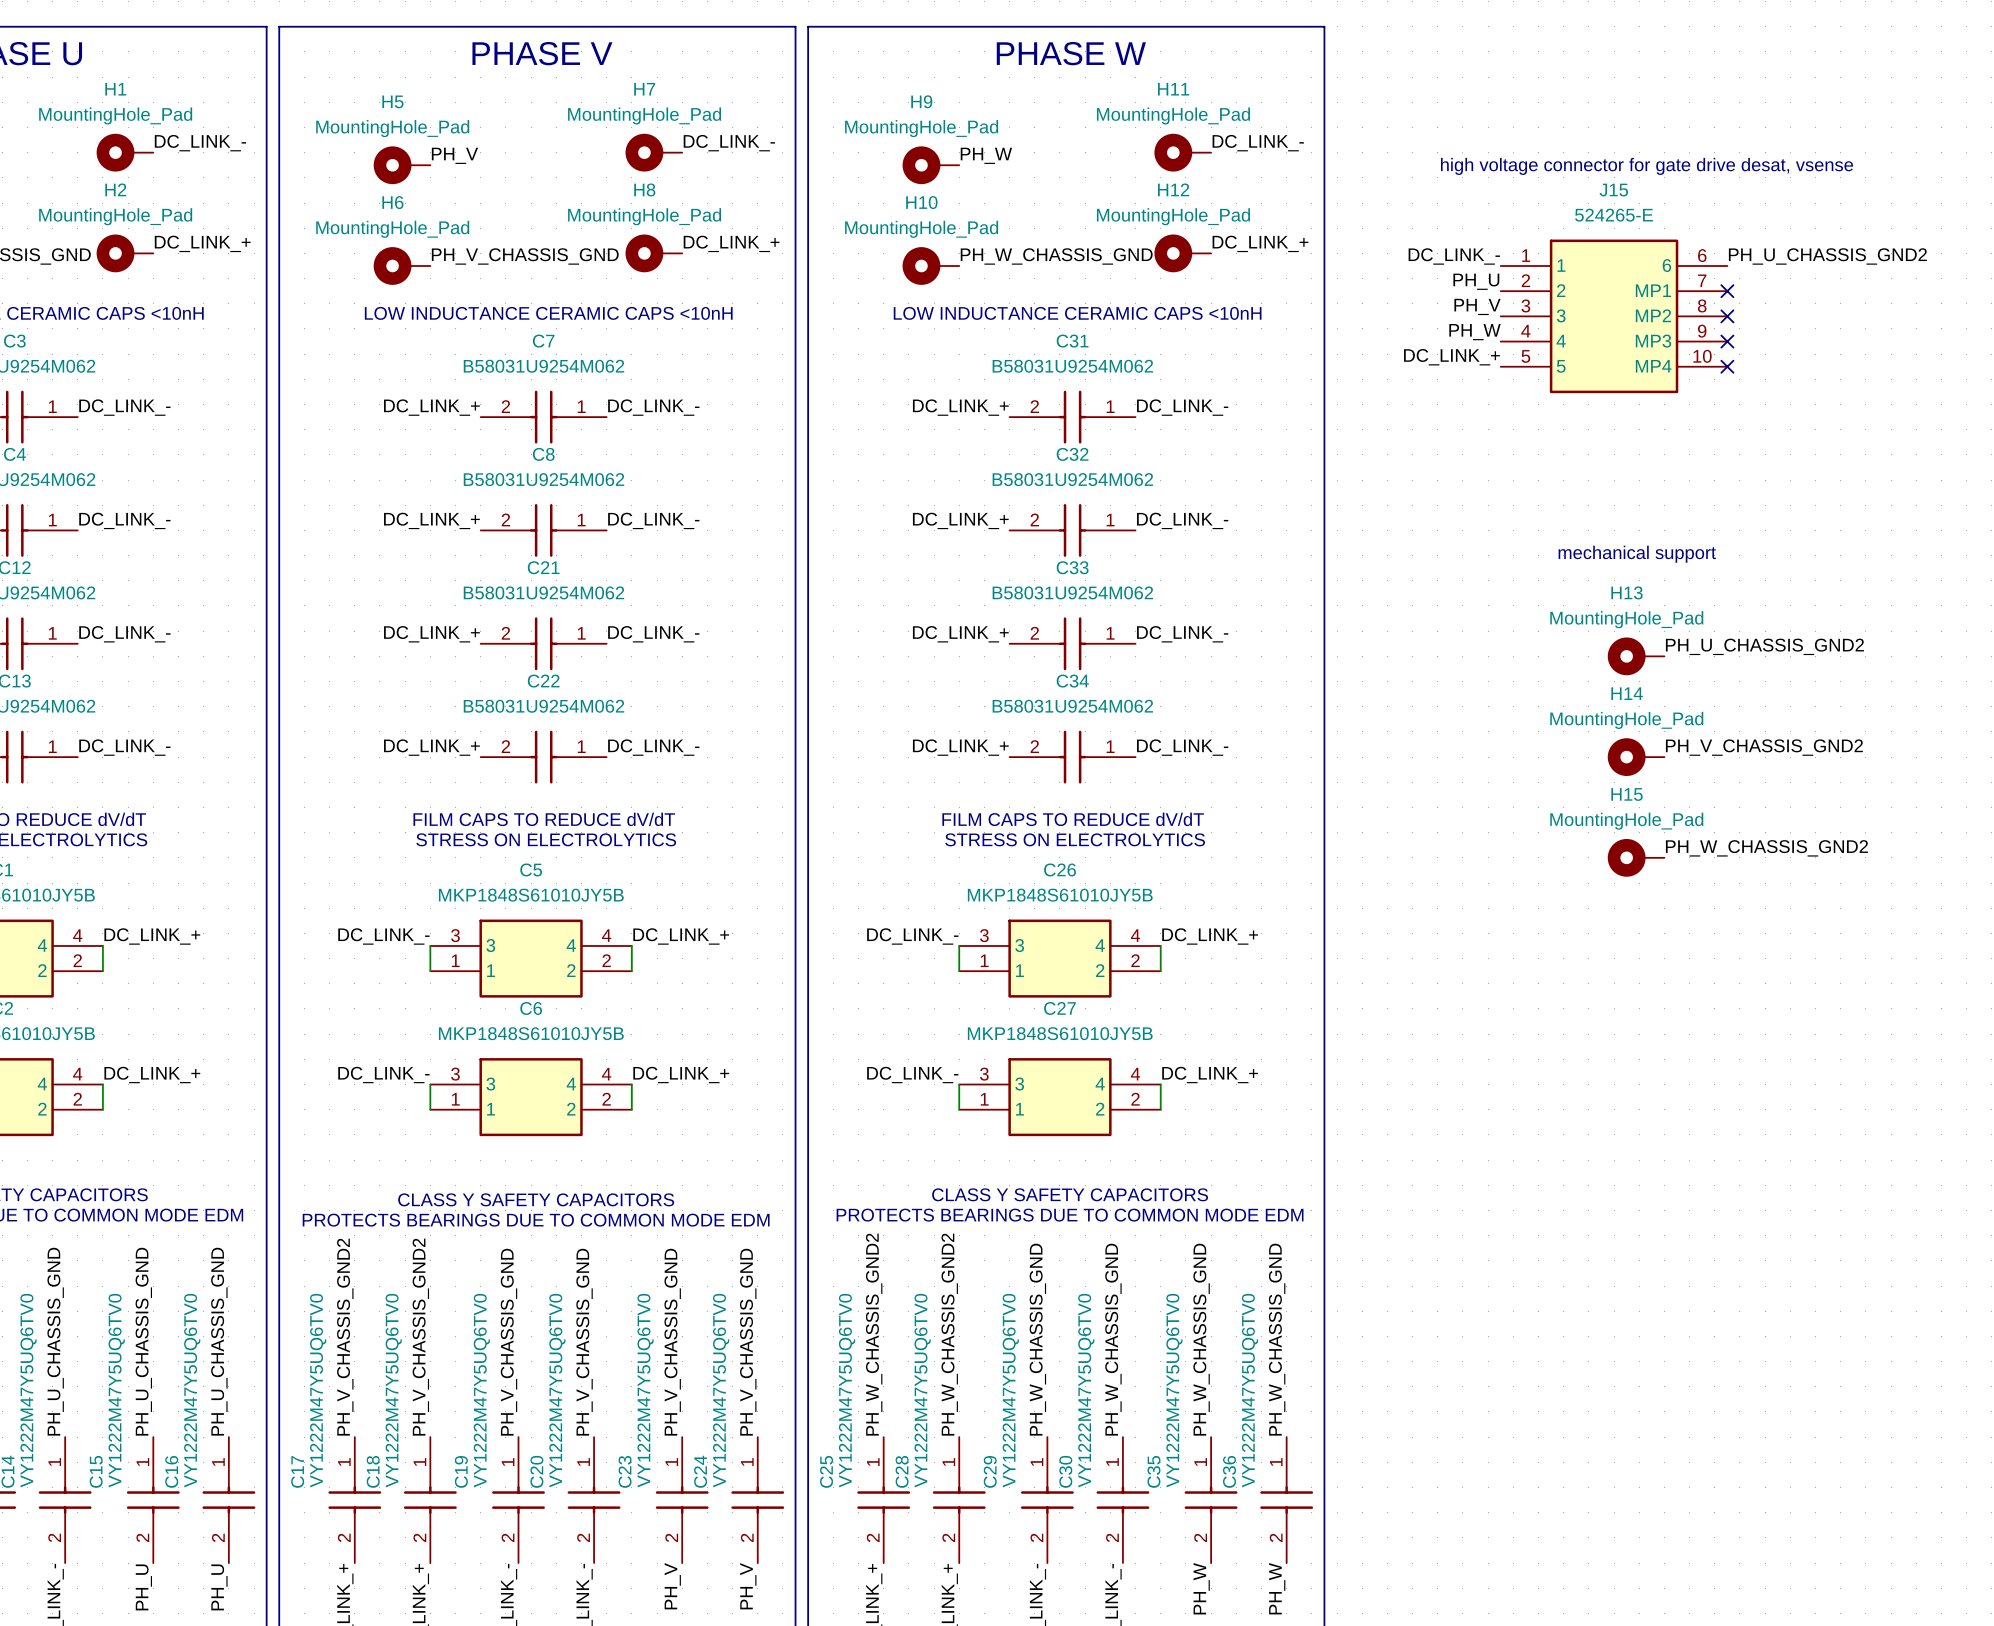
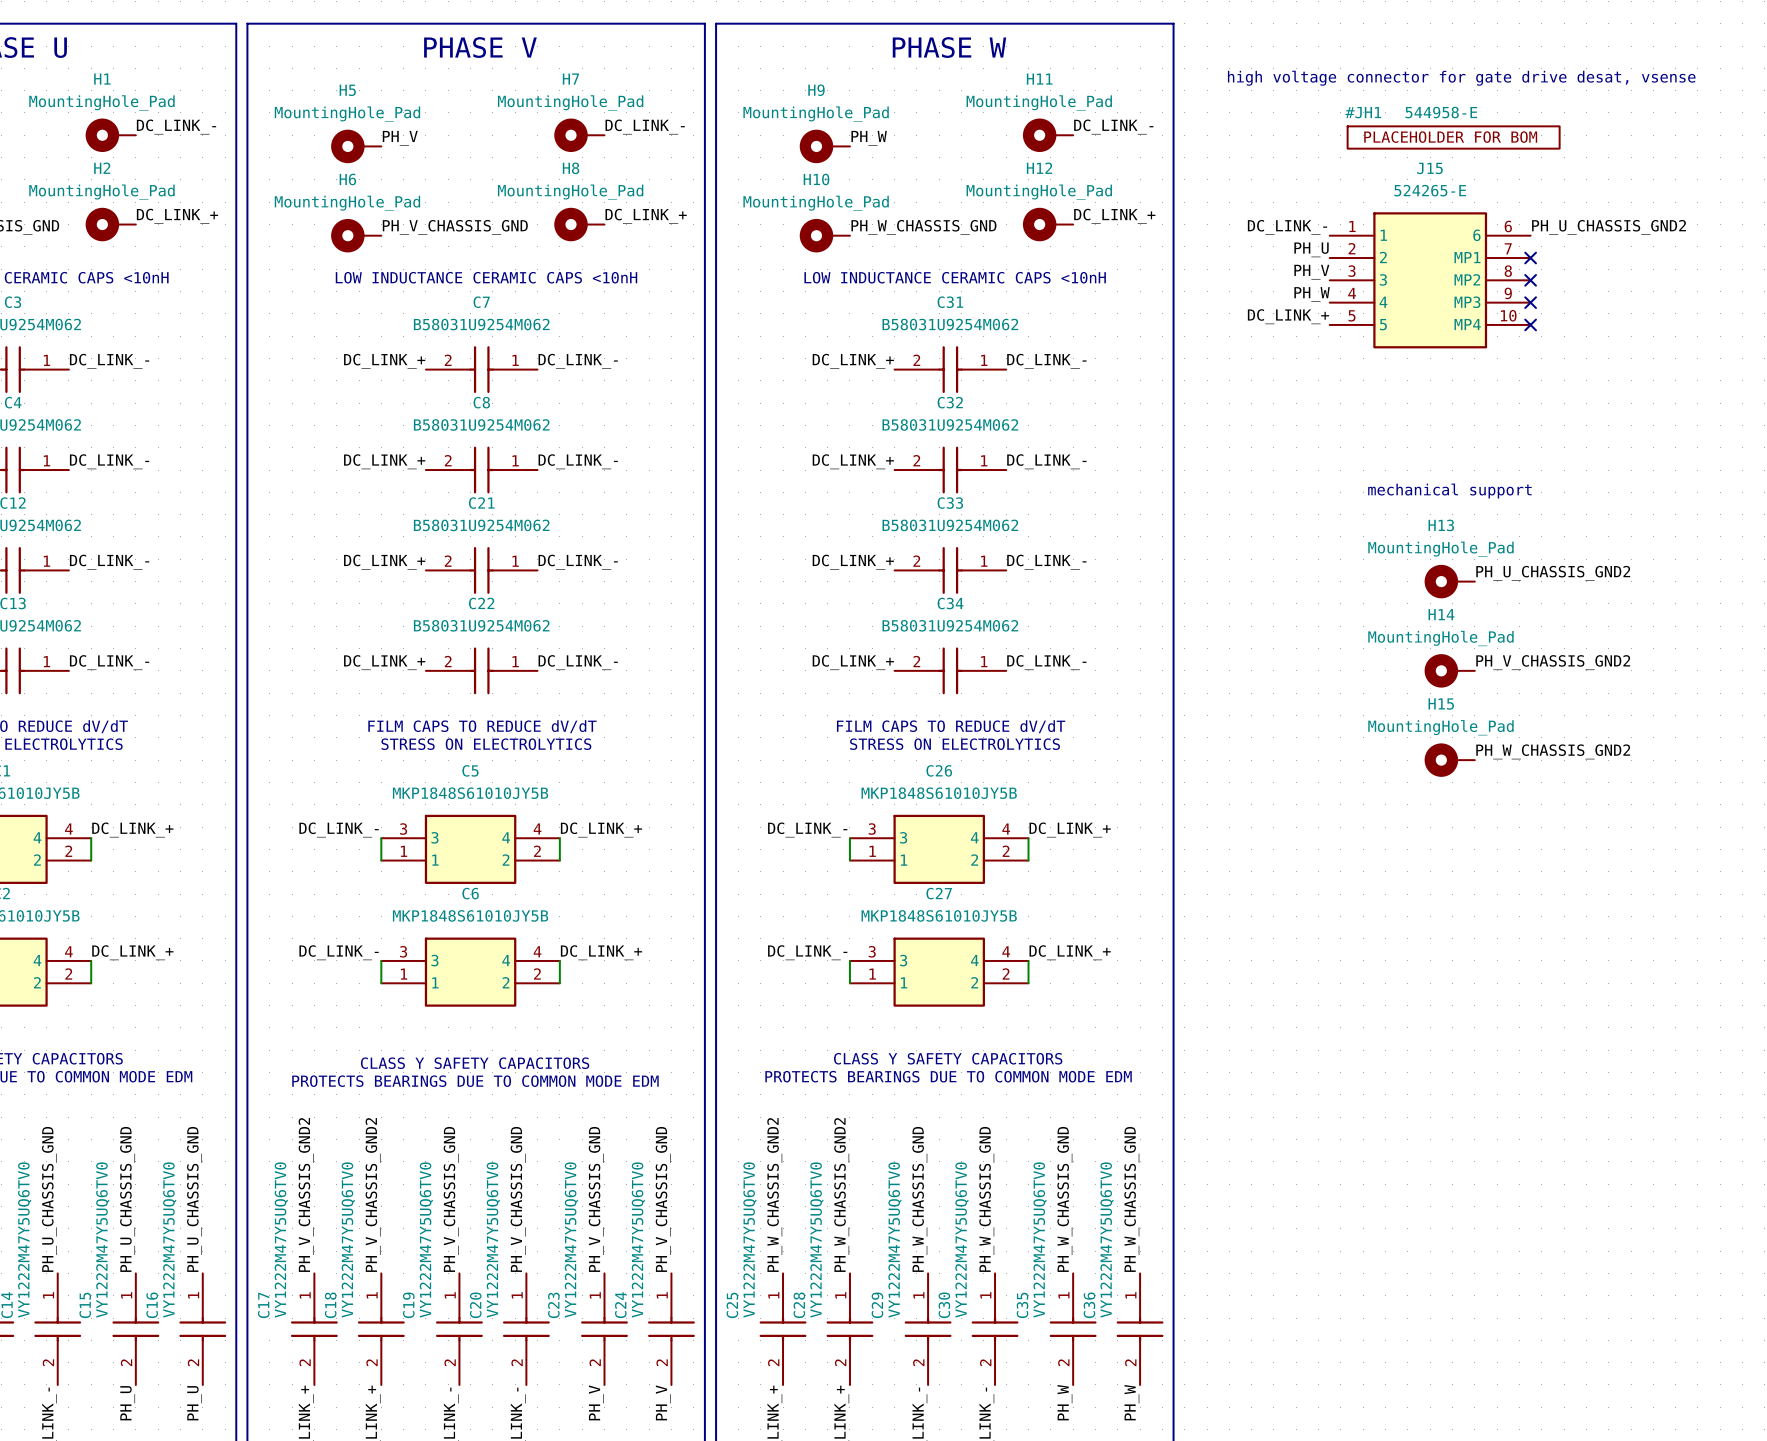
#JH1: none -> 544958-E (1453, 137)
text position: high voltage connector for gate drive desat, vsense (1647, 166) -> high voltage connector for gate drive desat, vsense (1461, 78)

